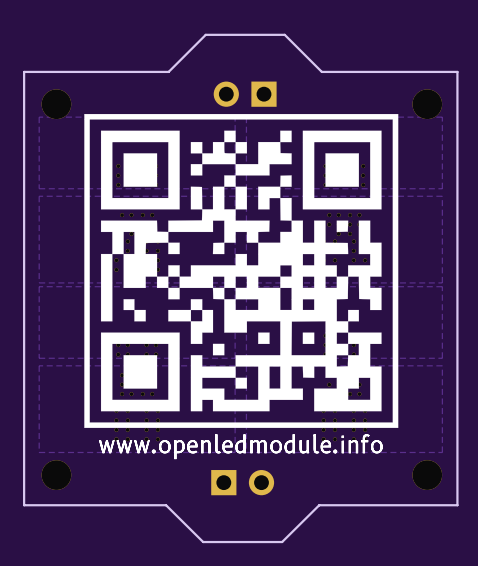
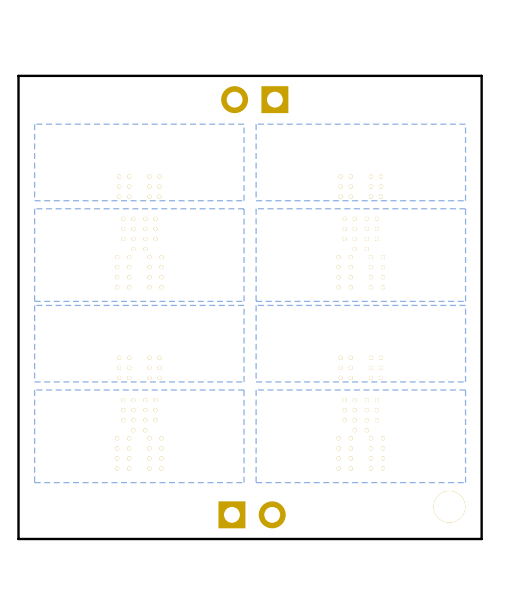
board edge: (321, 71) (284, 34) (205, 34) (168, 71) -> (336, 75) (173, 75)
part: (56, 104) -> none
part: (427, 104) -> none
drawing: [84, 113, 399, 428] -> none
text: www.openledmodule.info (240, 446) -> none
part: (56, 475) -> none
board edge: (319, 505) (282, 542) (203, 542) (166, 505) -> (333, 539) (170, 539)

